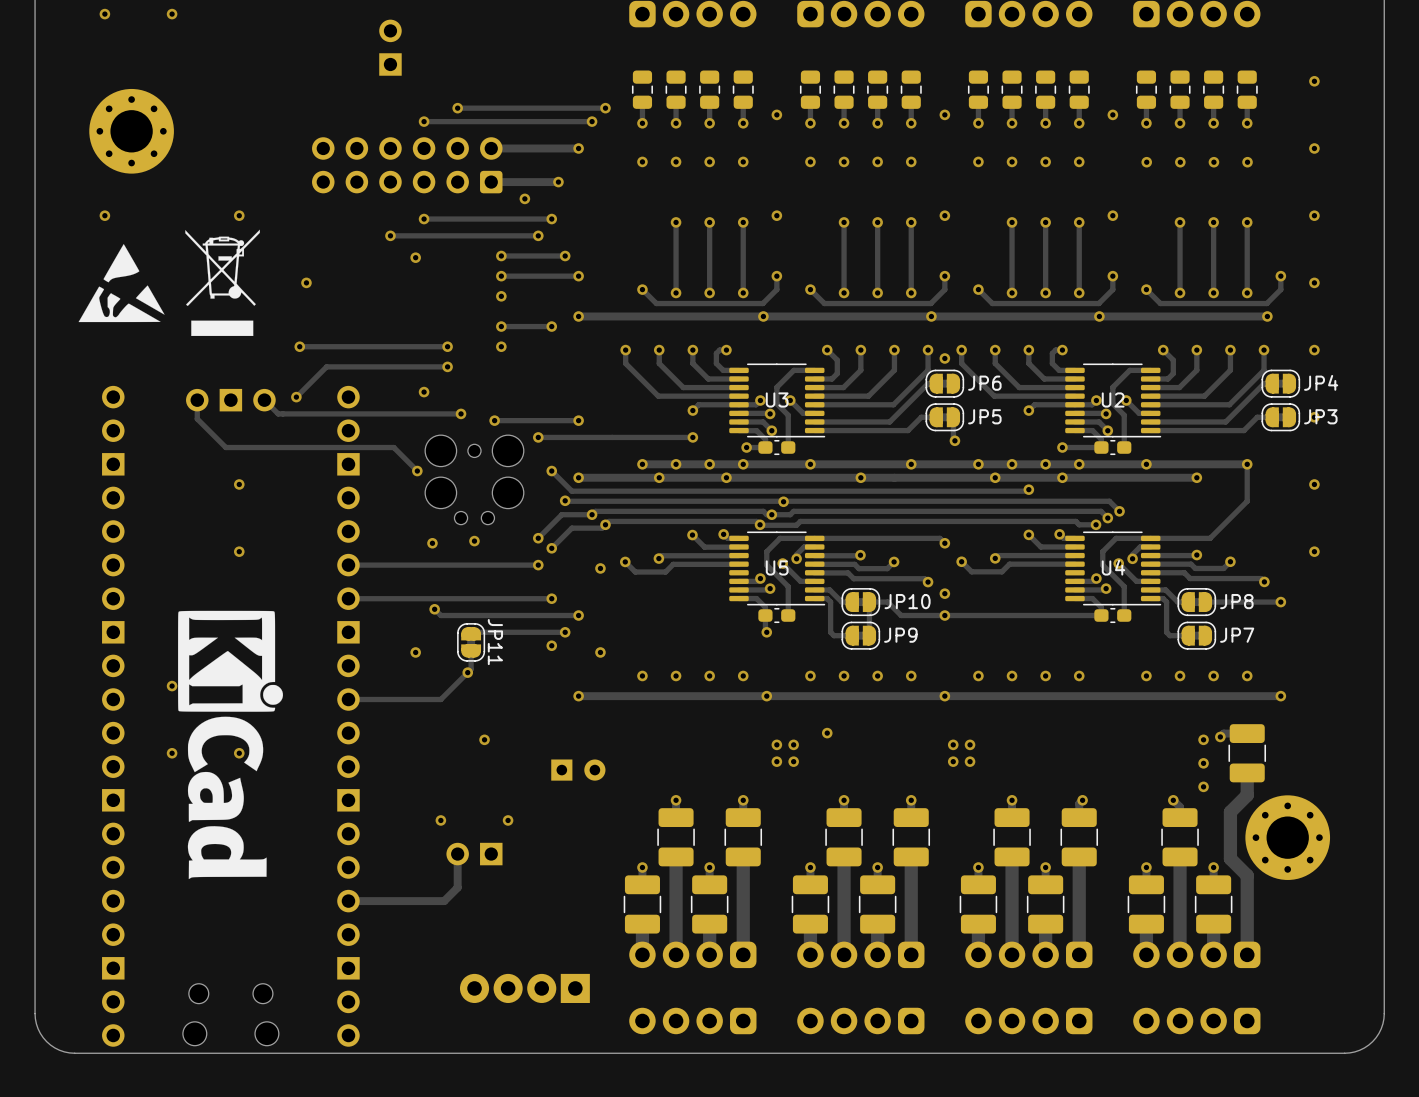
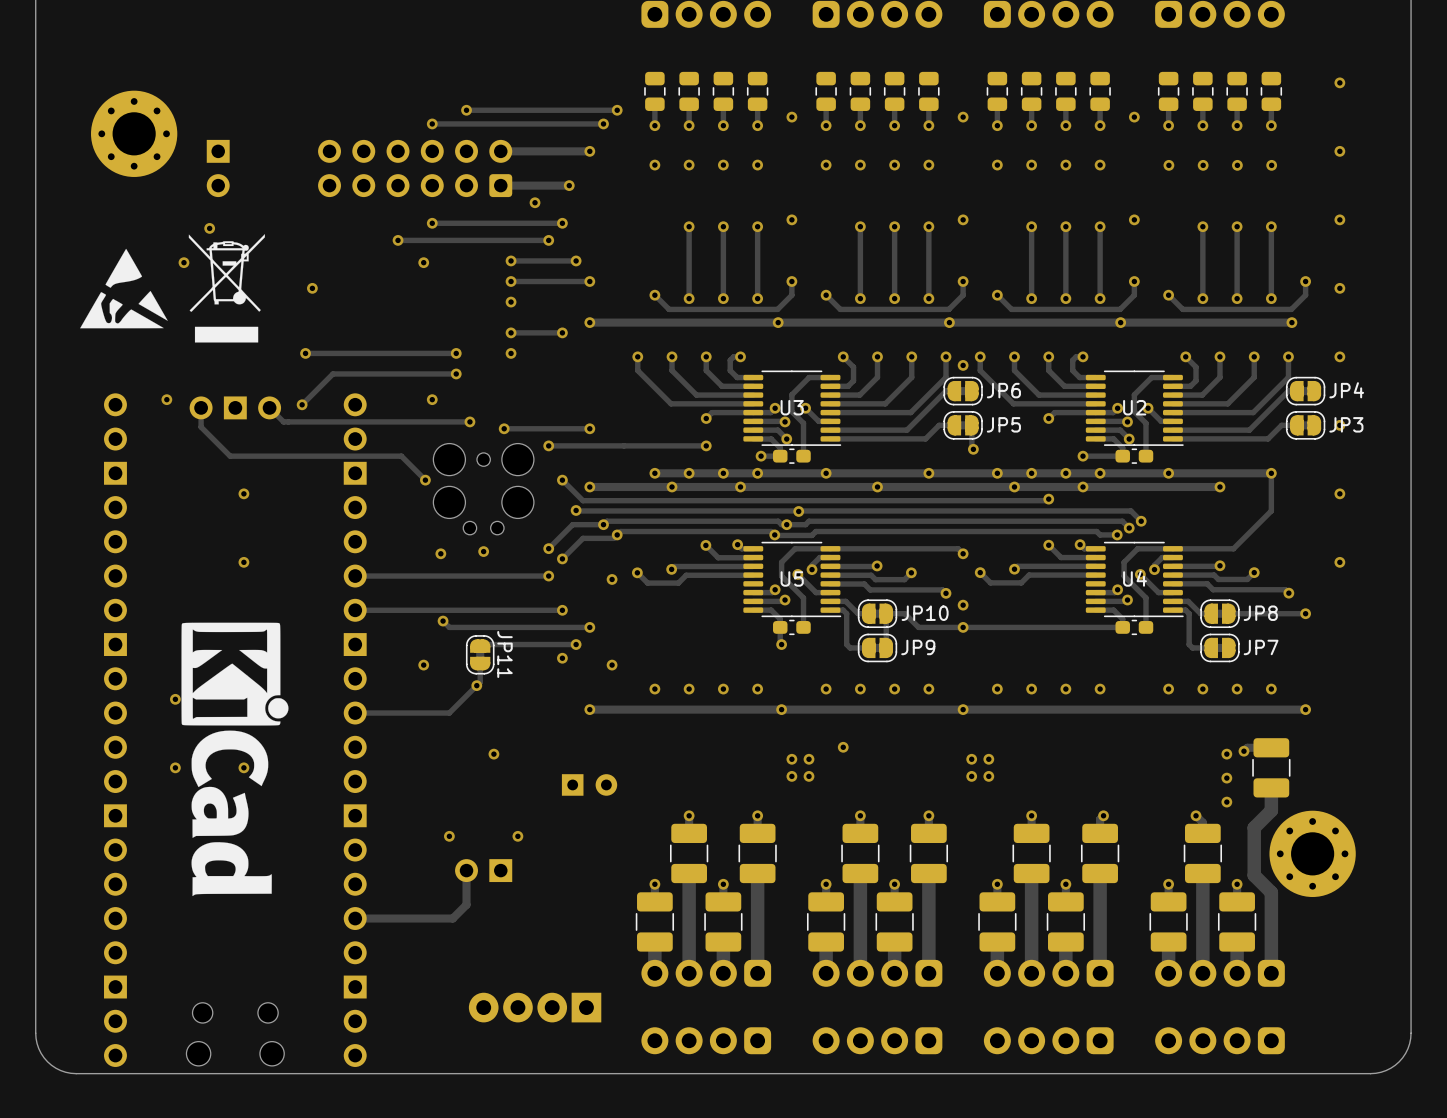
via: (104, 14) -> none
via: (172, 14) -> none
part rotation: 0° (390, 47) -> 180° (218, 168)
part position: (390, 47) -> (218, 168)
via: (104, 215) -> none
via position: (239, 215) -> (209, 228)
via: none -> (183, 262)
via: none -> (166, 399)

